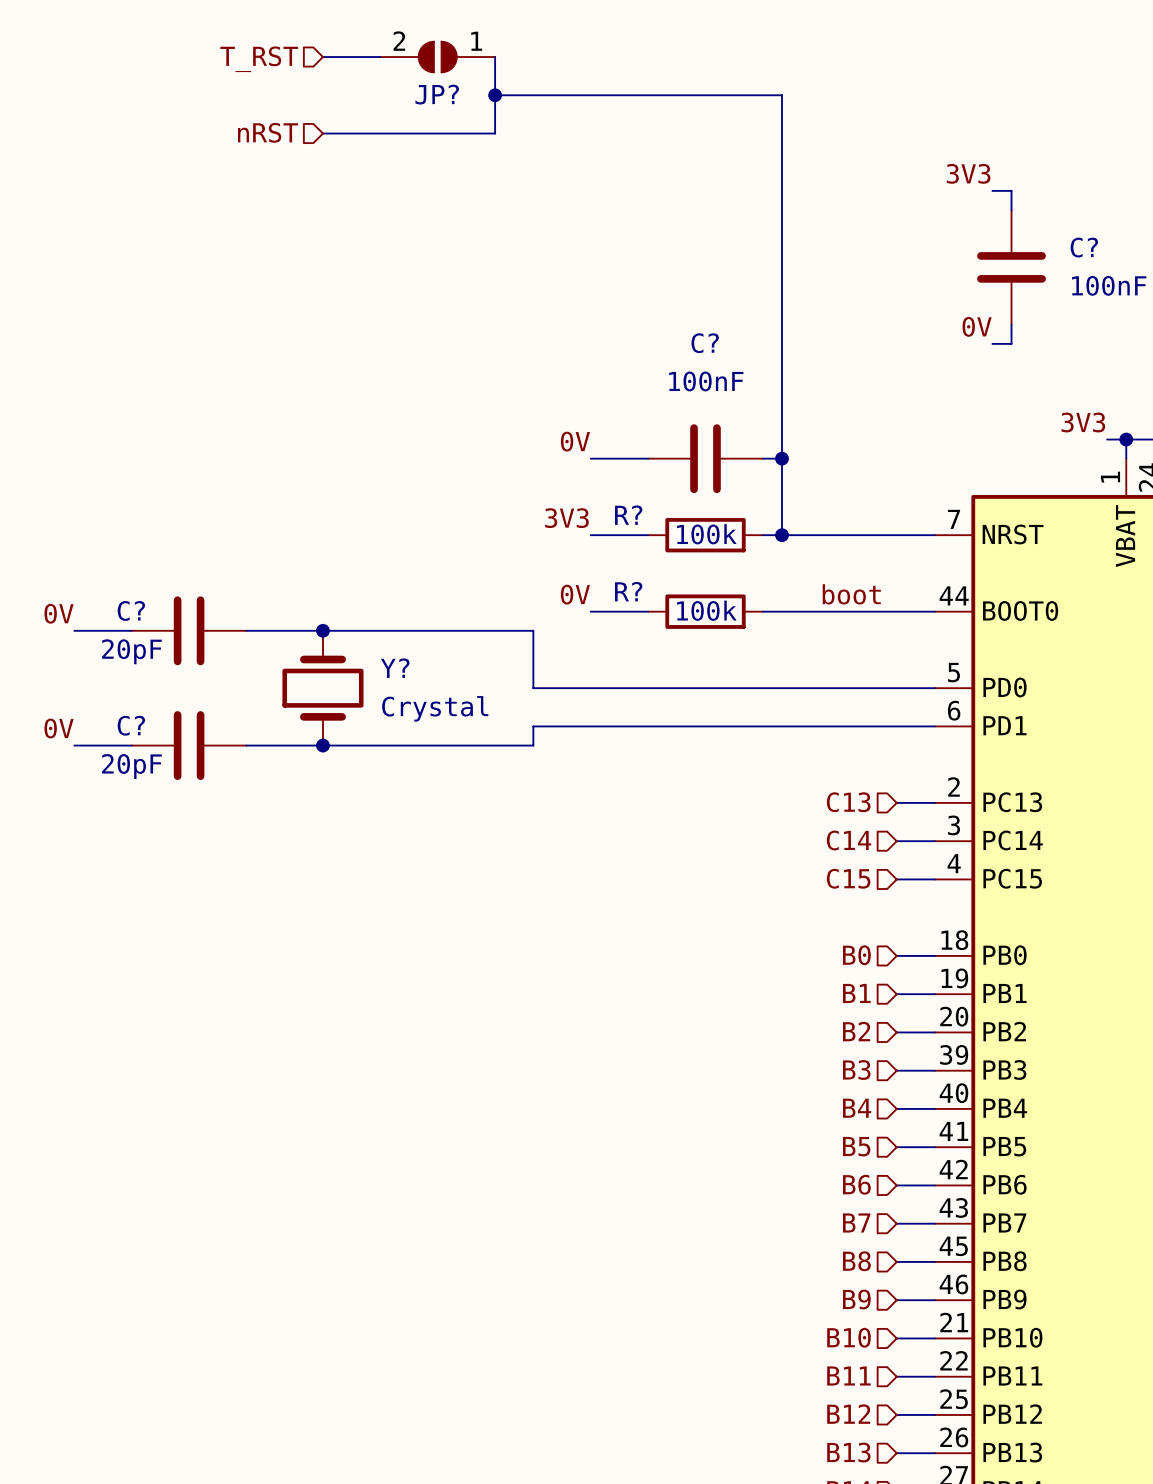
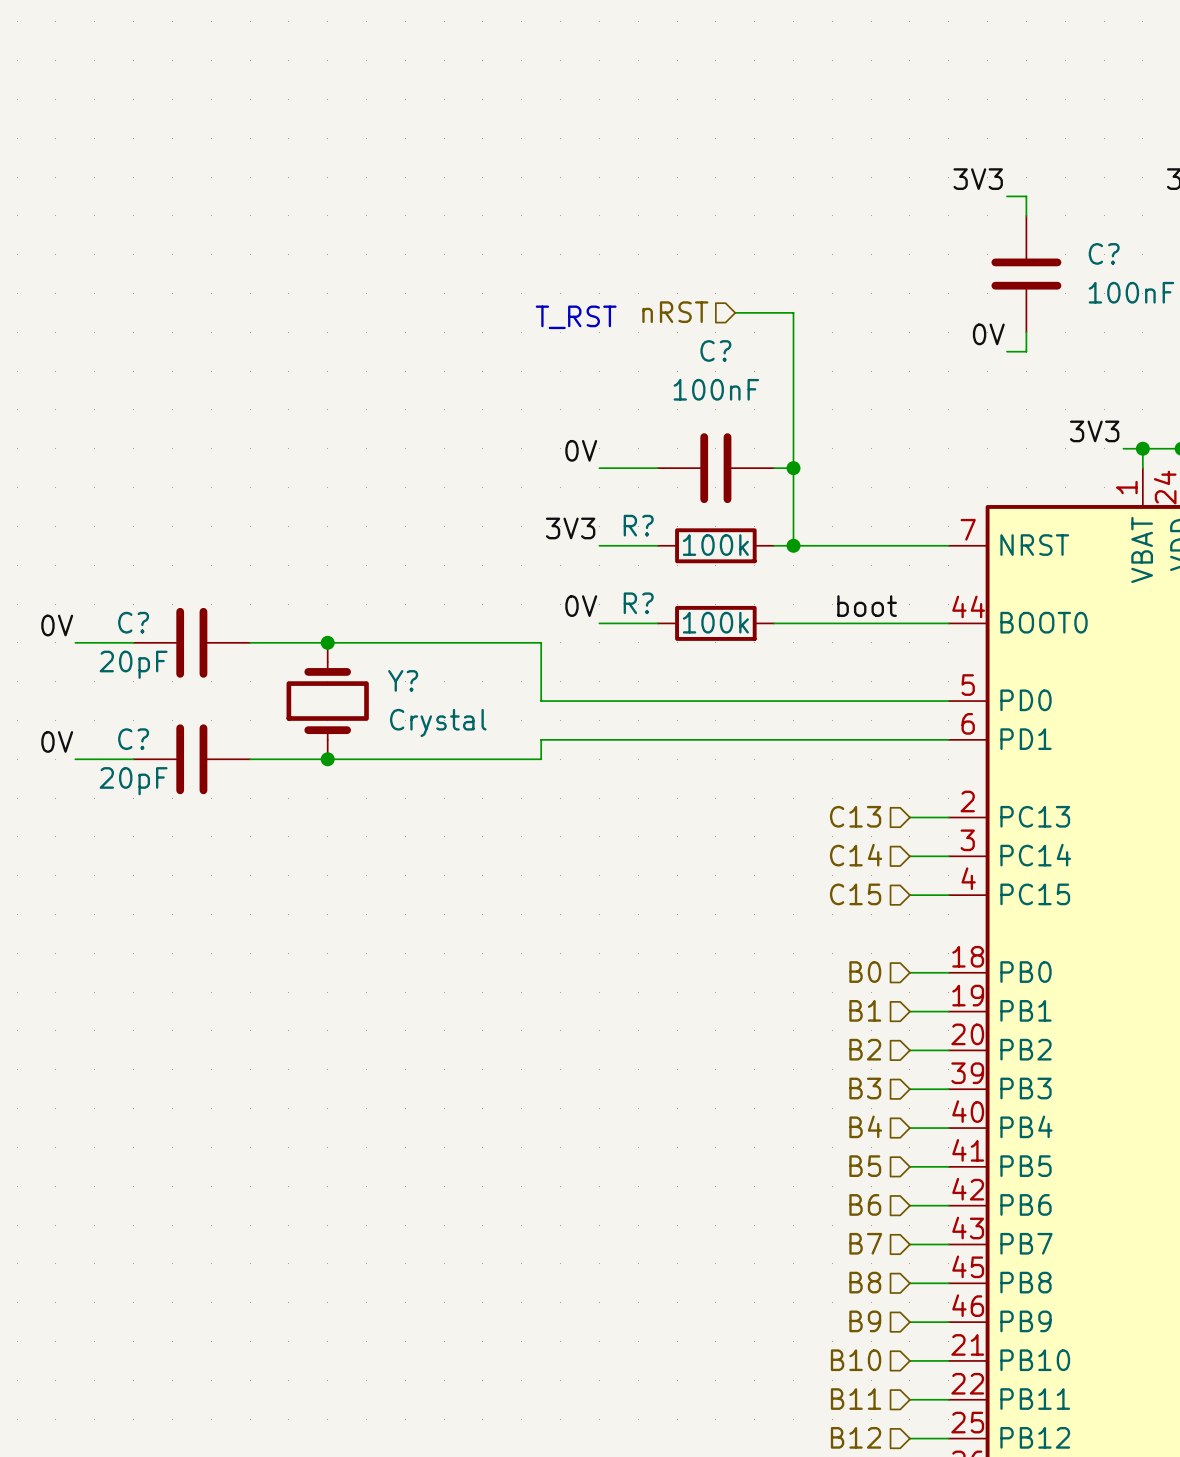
wire: (322, 57) (380, 57) -> none
JP?: (437, 57) -> none
wire: (495, 57) (495, 133) (322, 133) -> none
hierarchical label: T_RST (259, 59) -> none
wire: (495, 95) (782, 95) (782, 305) -> (735, 312) (793, 312)
junction: (495, 95) -> none
hierarchical label: nRST (268, 132) -> none
hierarchical label: none -> nRST (675, 312)
text: none -> T_RST (576, 317)

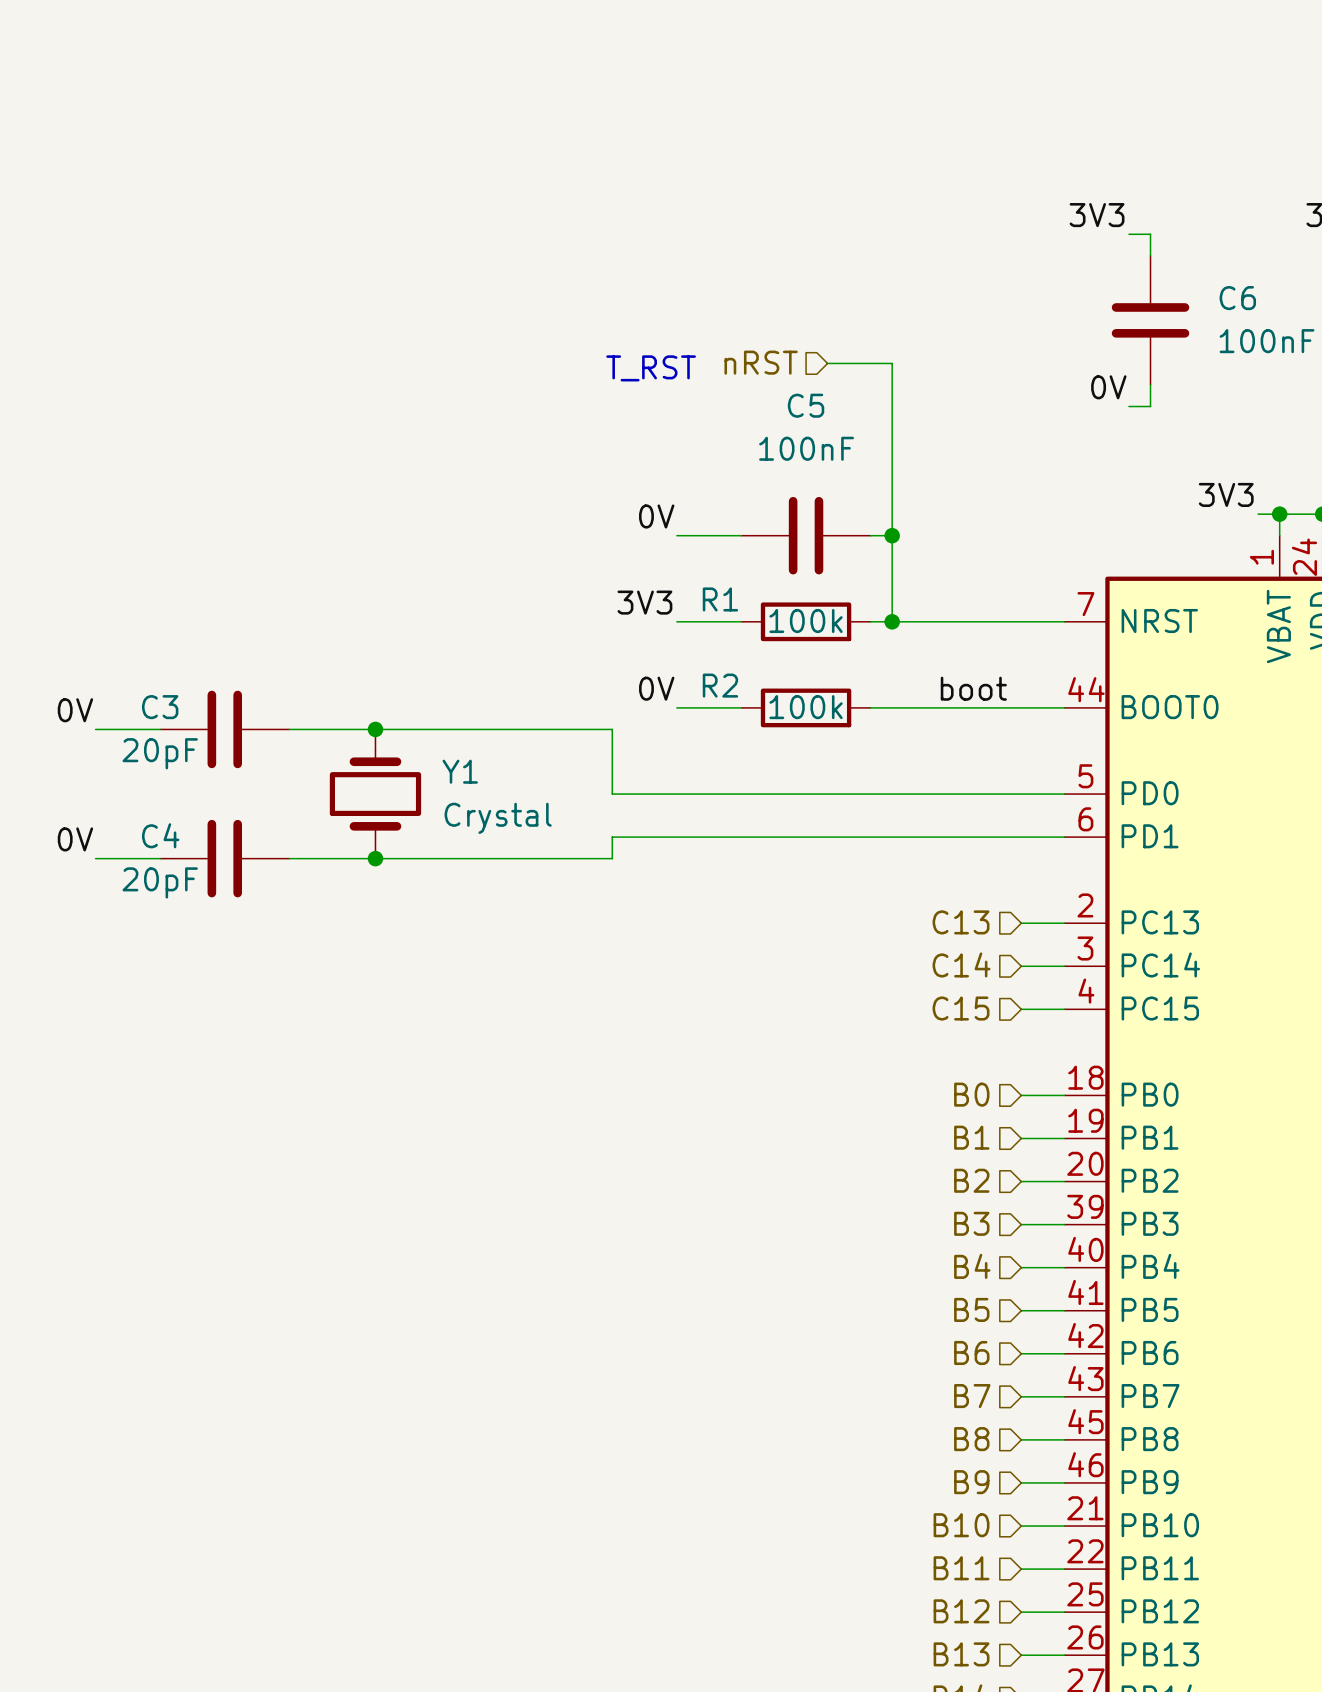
C? name: C? (1104, 253) -> C6 (1237, 298)
C? name: C? (715, 350) -> C5 (806, 405)
R? name: R? (638, 525) -> R1 (720, 599)
R? name: R? (638, 603) -> R2 (720, 685)
C? name: C? (133, 622) -> C3 (160, 707)
Y? name: Y? (403, 680) -> Y1 (460, 771)
C? name: C? (133, 739) -> C4 (160, 835)

